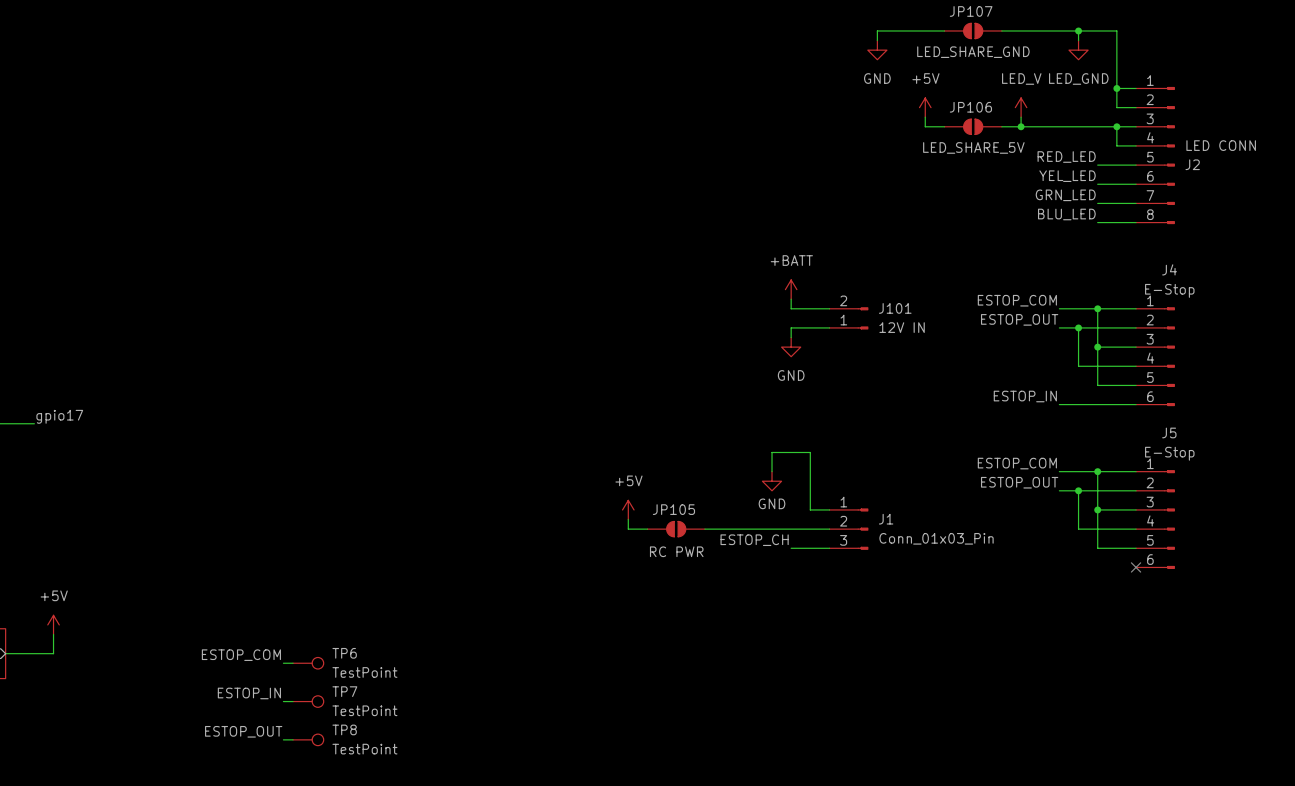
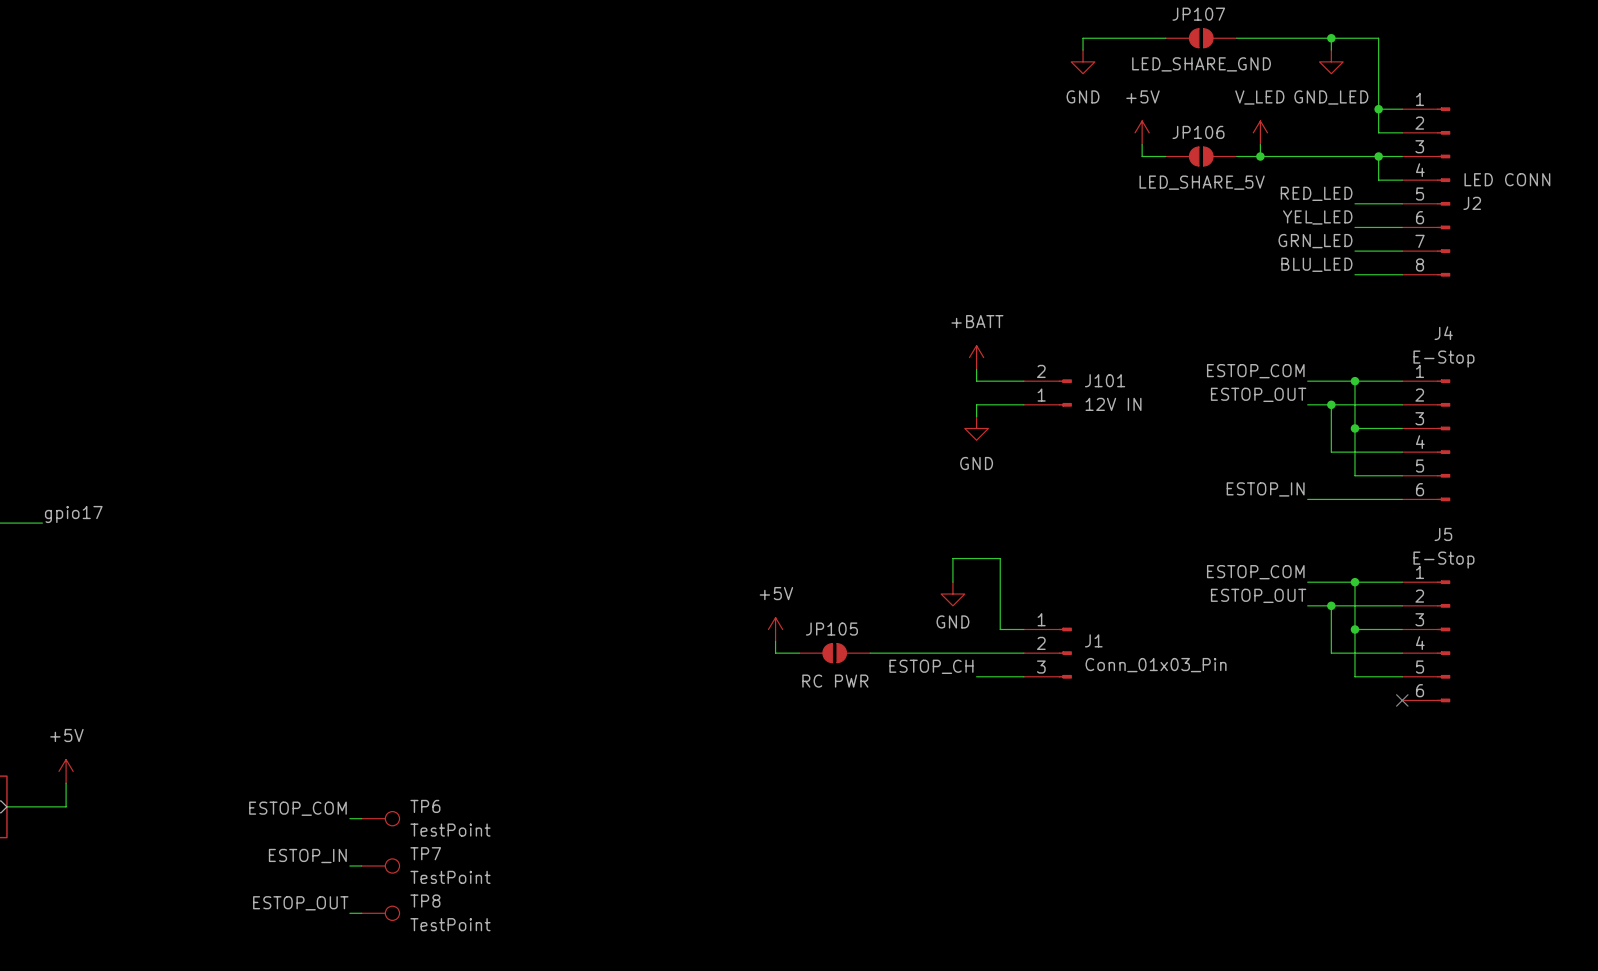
power symbol: LED_GND (1078, 50) -> GND_LED (1331, 61)
power symbol: LED_V (1021, 107) -> V_LED (1260, 132)

